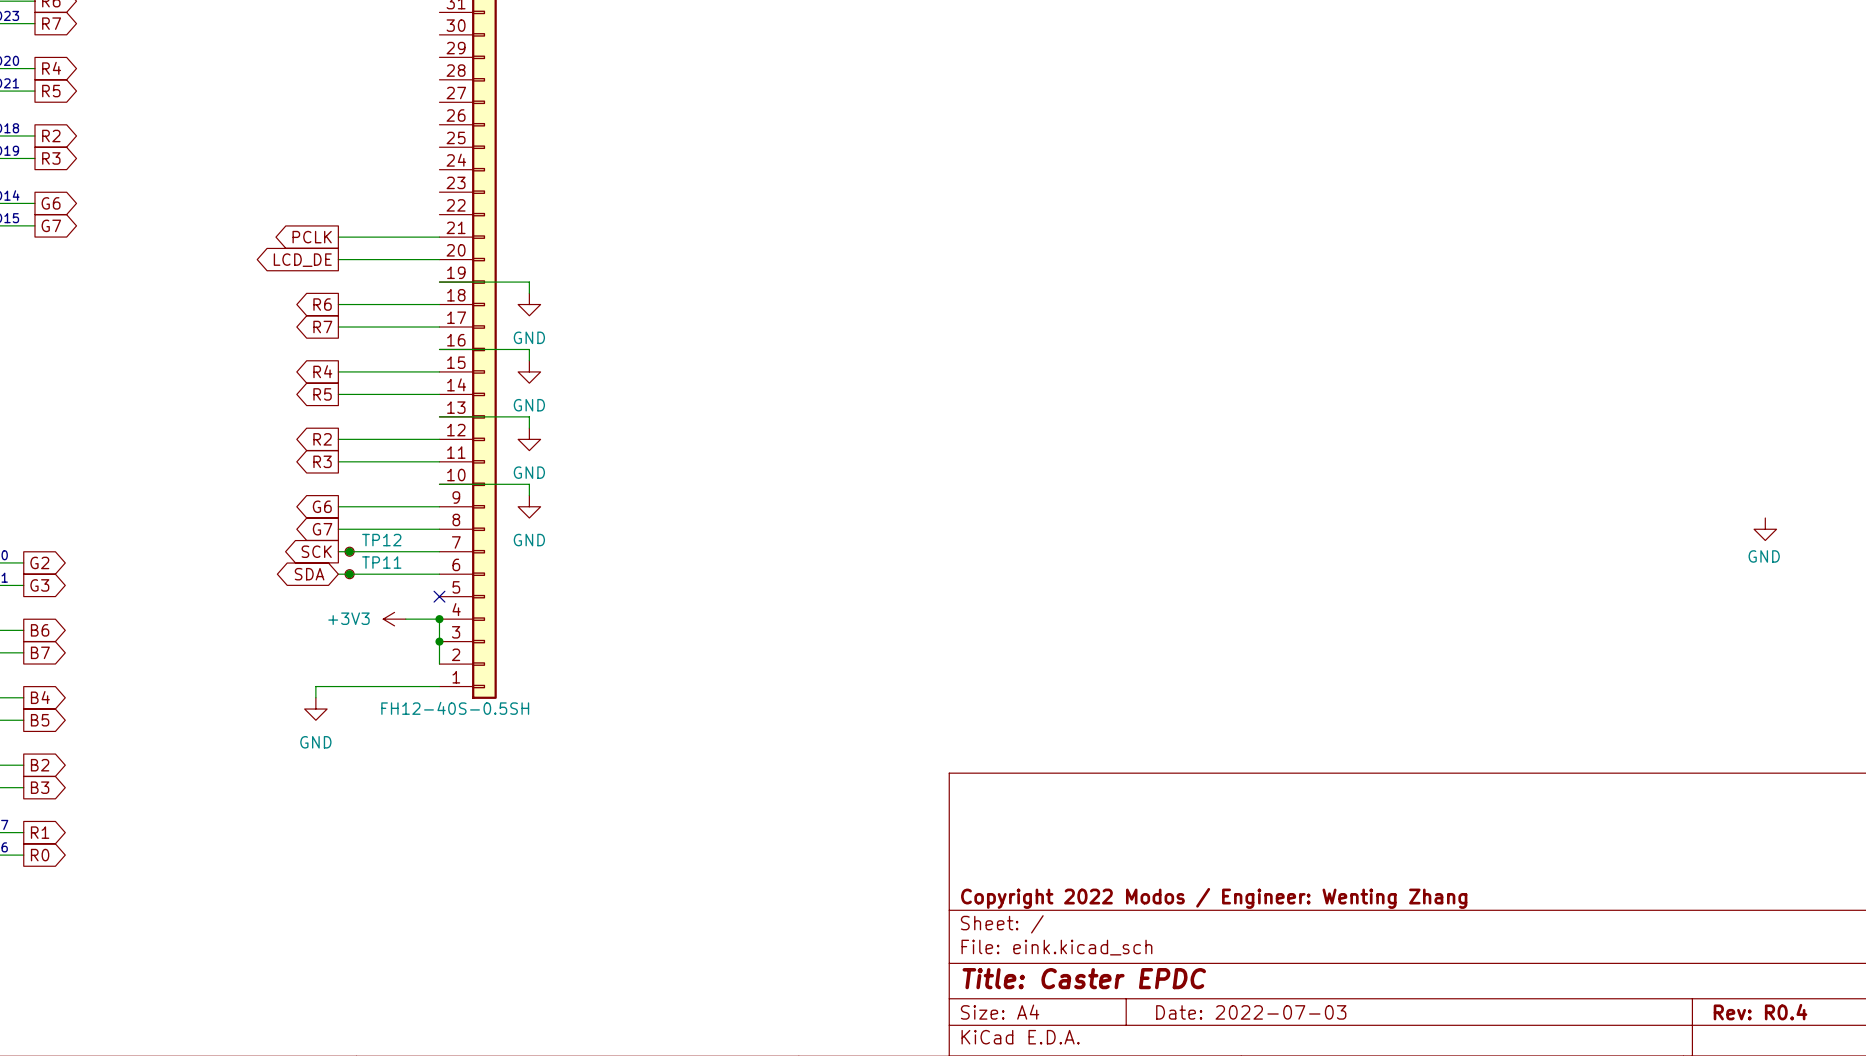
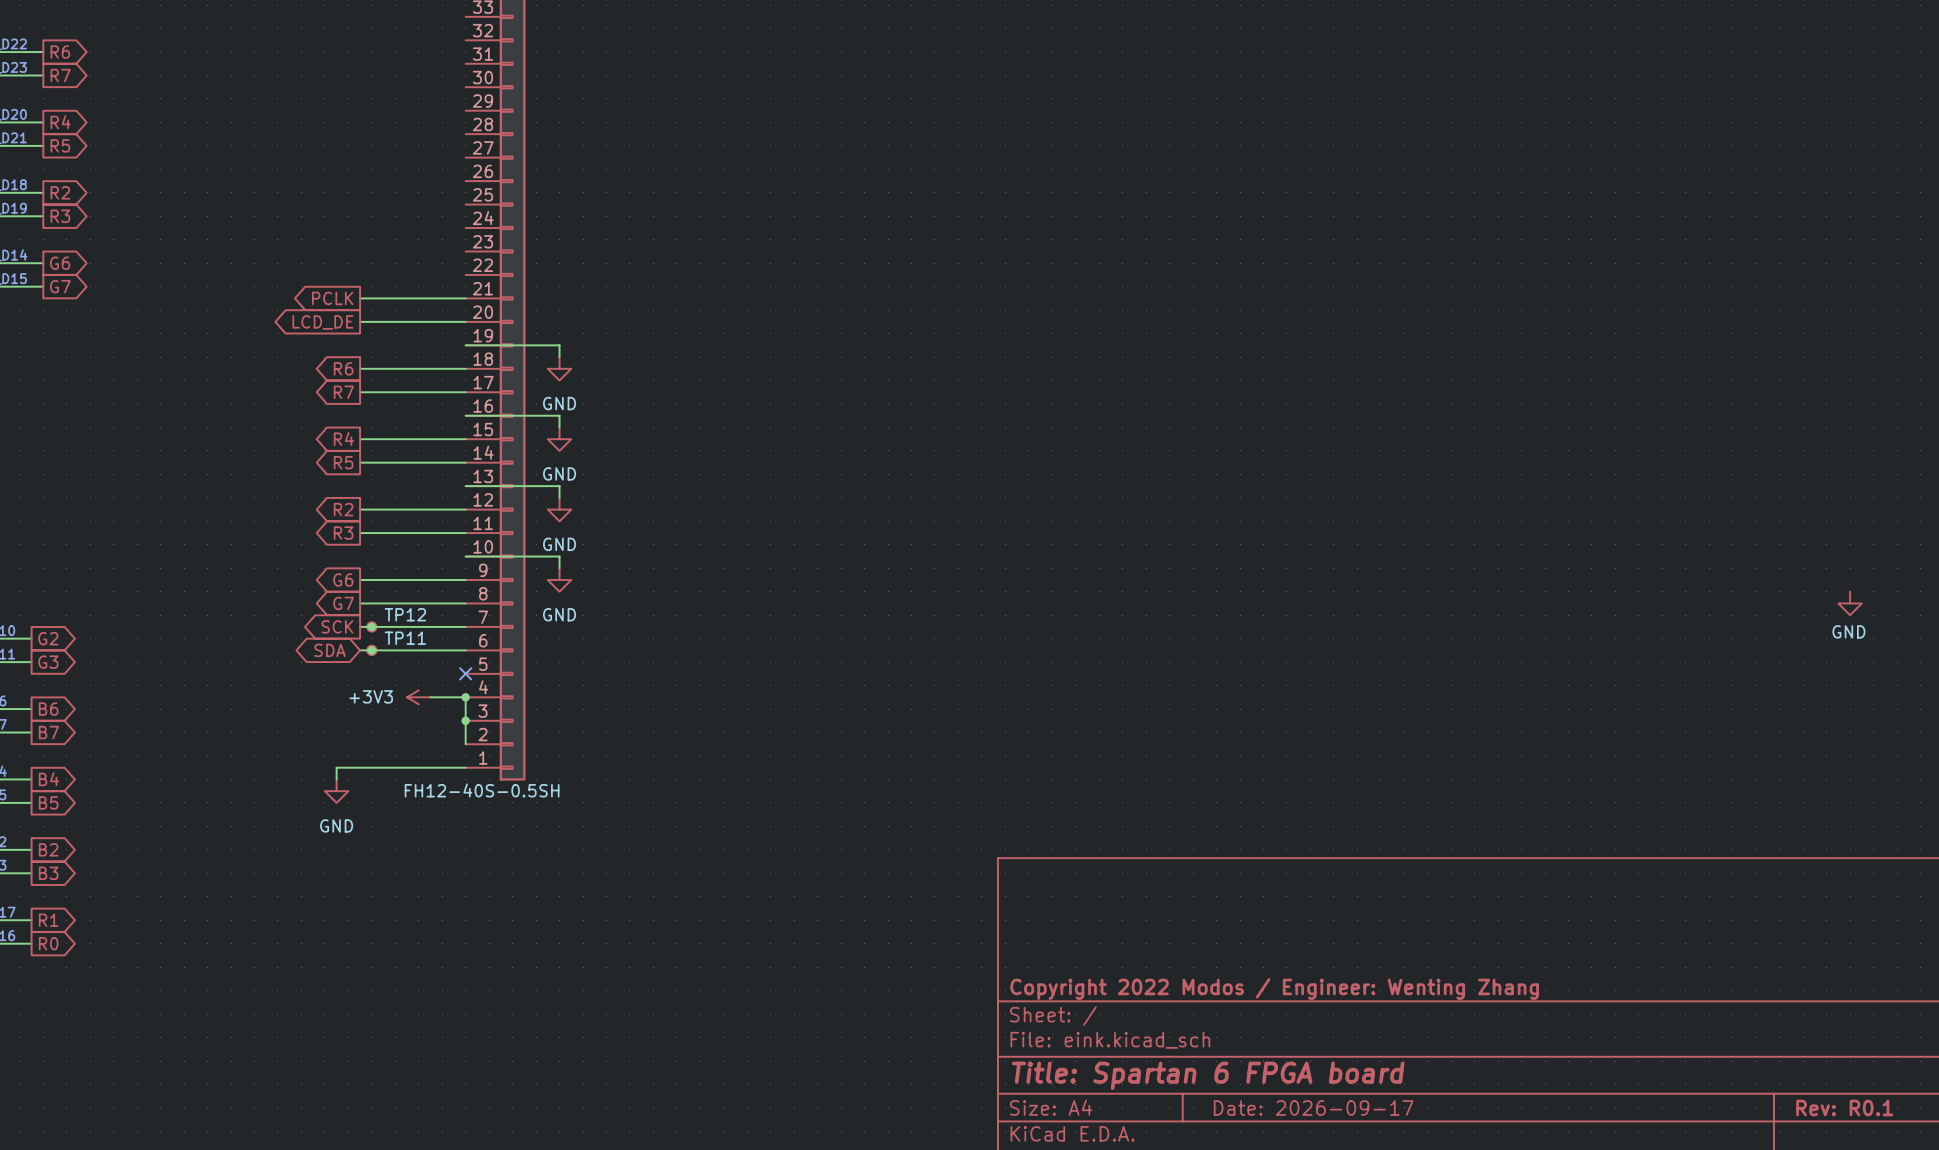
title block: Title: Caster EPDC (1084, 978) -> Title: Spartan 6 FPGA board (1208, 1075)
title block: Date: 2022-07-03 (1251, 1012) -> Date: 2026-09-17 (1313, 1107)
title block: Rev: R0.4 (1760, 1012) -> Rev: R0.1 (1844, 1107)

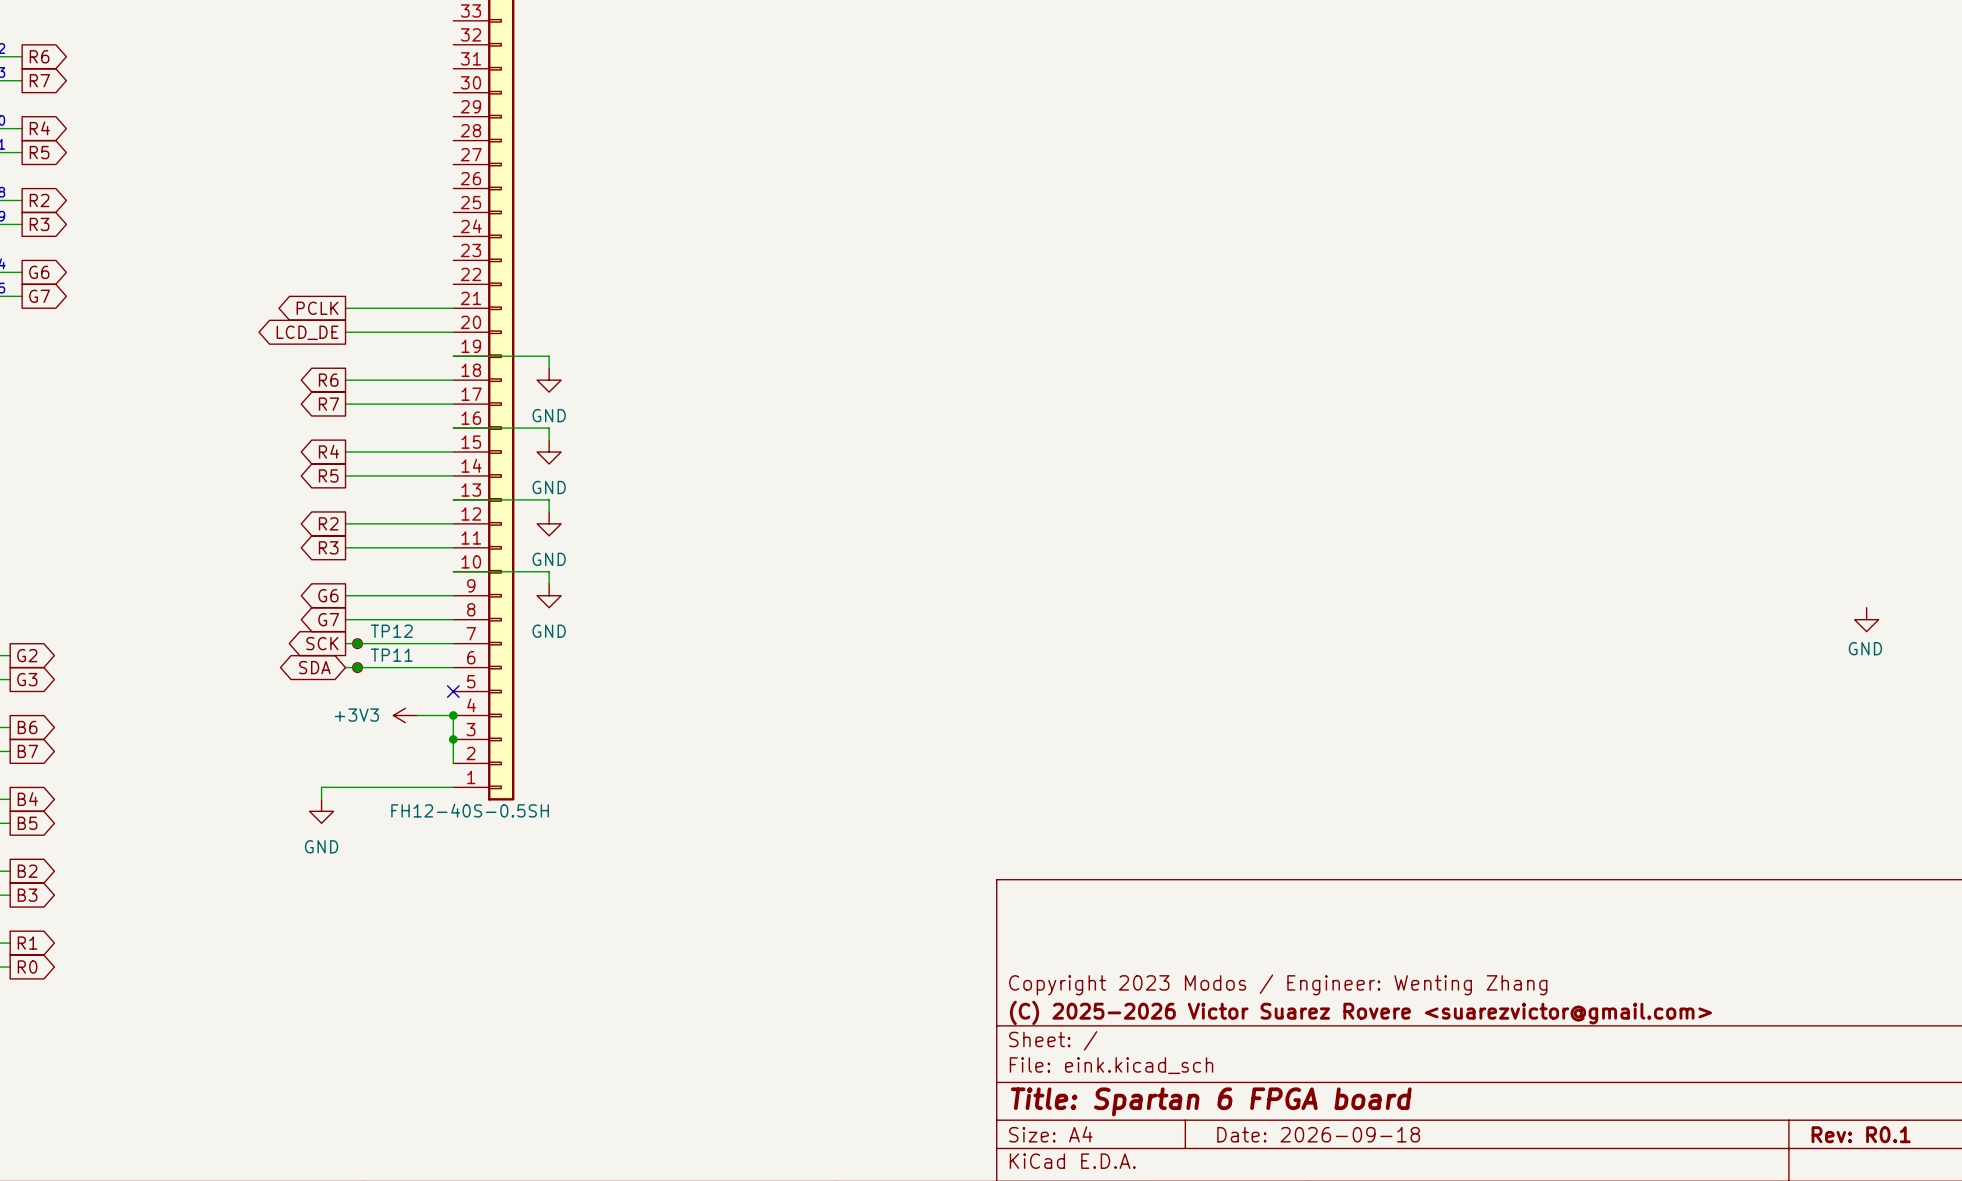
title block: none -> Copyright 2023 Modos / Engineer: Wenting Zhang (1278, 984)
title block: Copyright 2022 Modos / Engineer: Wenting Zhang (1274, 988) -> (C) 2025-2026 Victor Suarez Rovere <suarezvictor@gmail.com> (1360, 1012)
title block: Date: 2026-09-17 (1313, 1107) -> Date: 2026-09-18 (1318, 1134)

